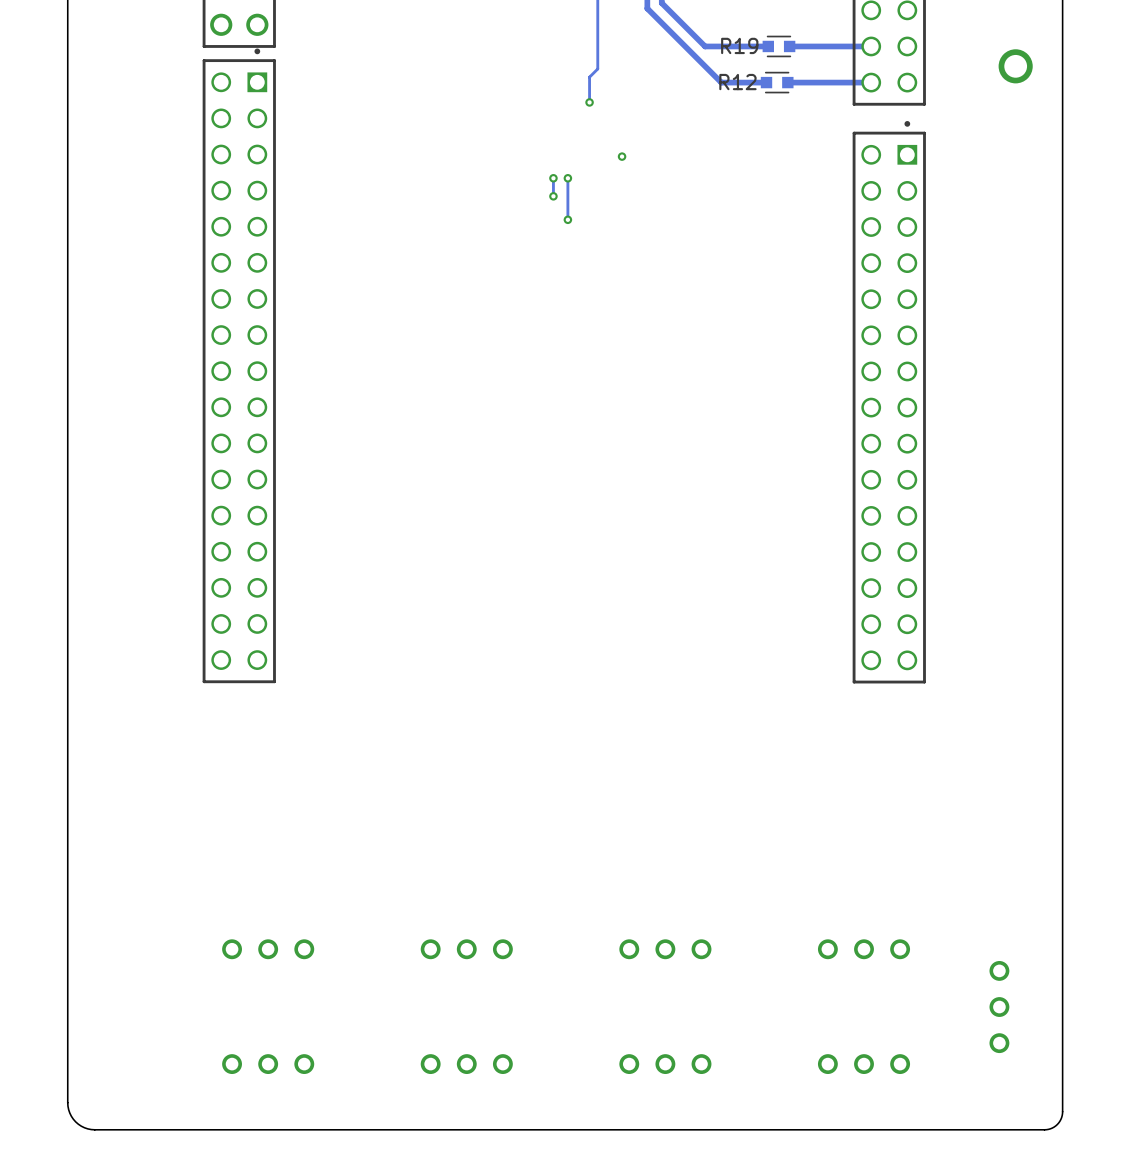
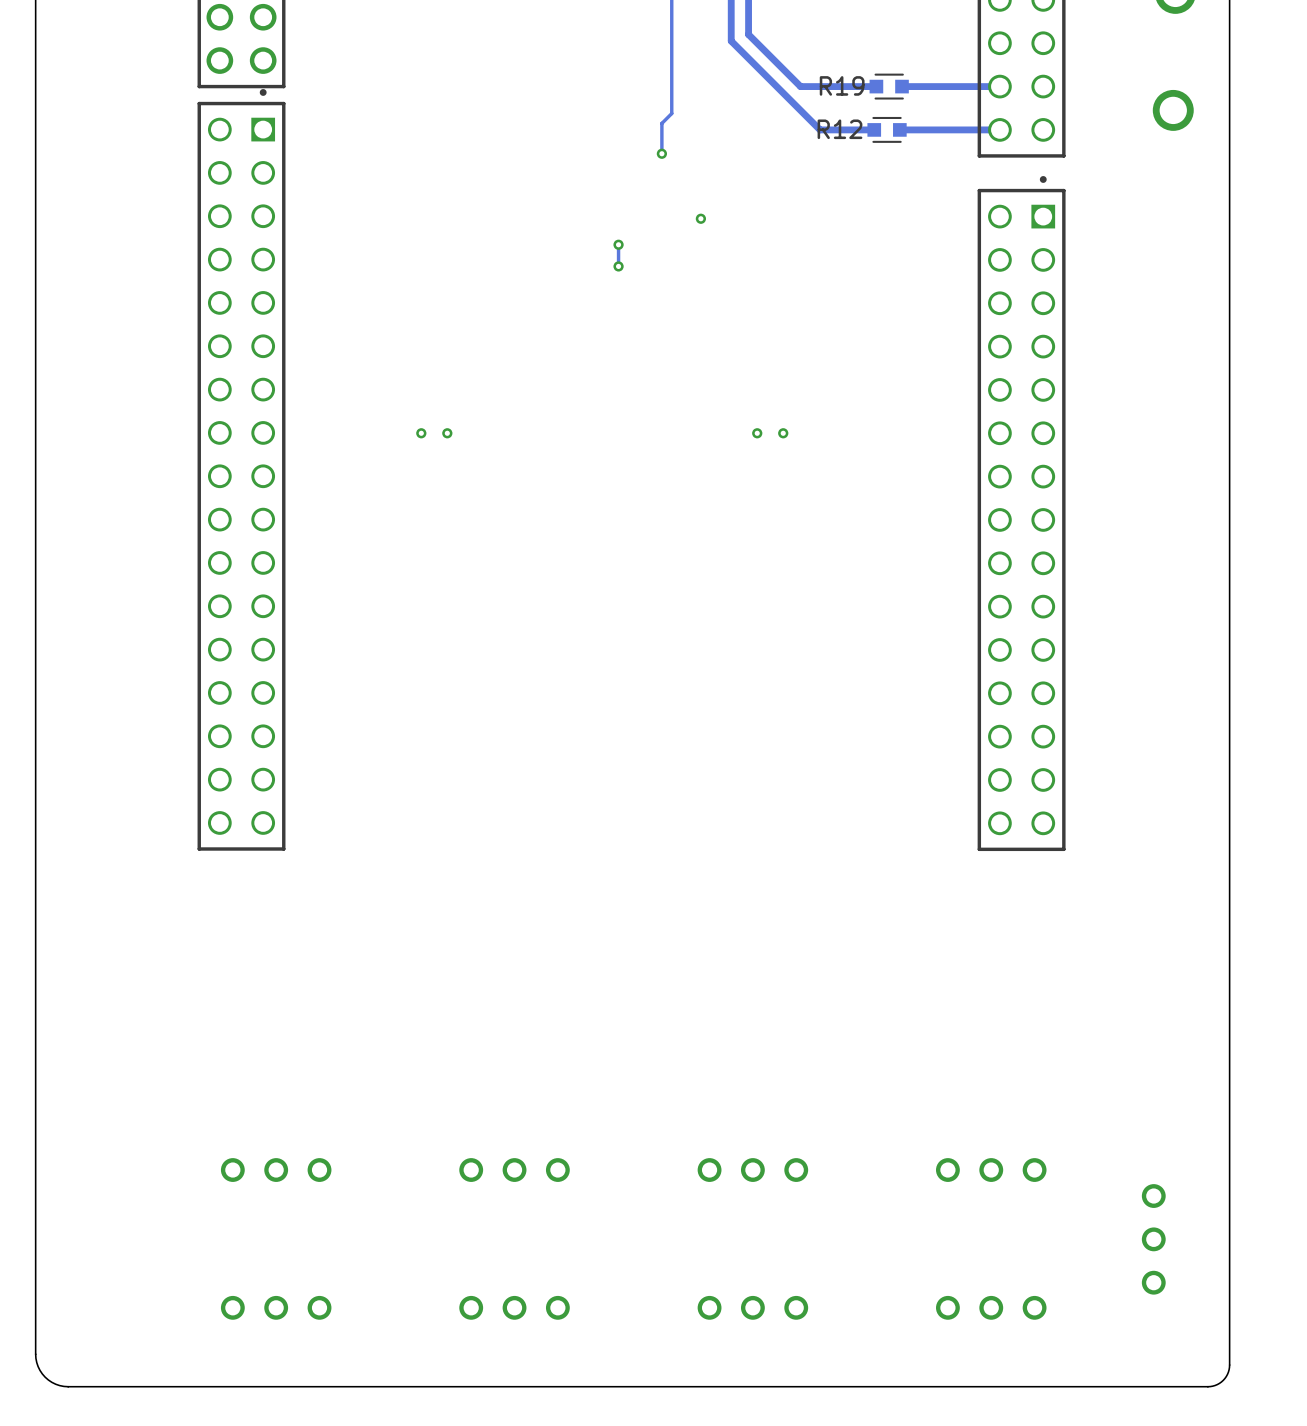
track: (567, 178) (567, 219) -> none
via: (567, 178) -> none
via: (567, 219) -> none
via: none -> (421, 433)
via: none -> (447, 433)
via: none -> (757, 433)
via: none -> (783, 433)

